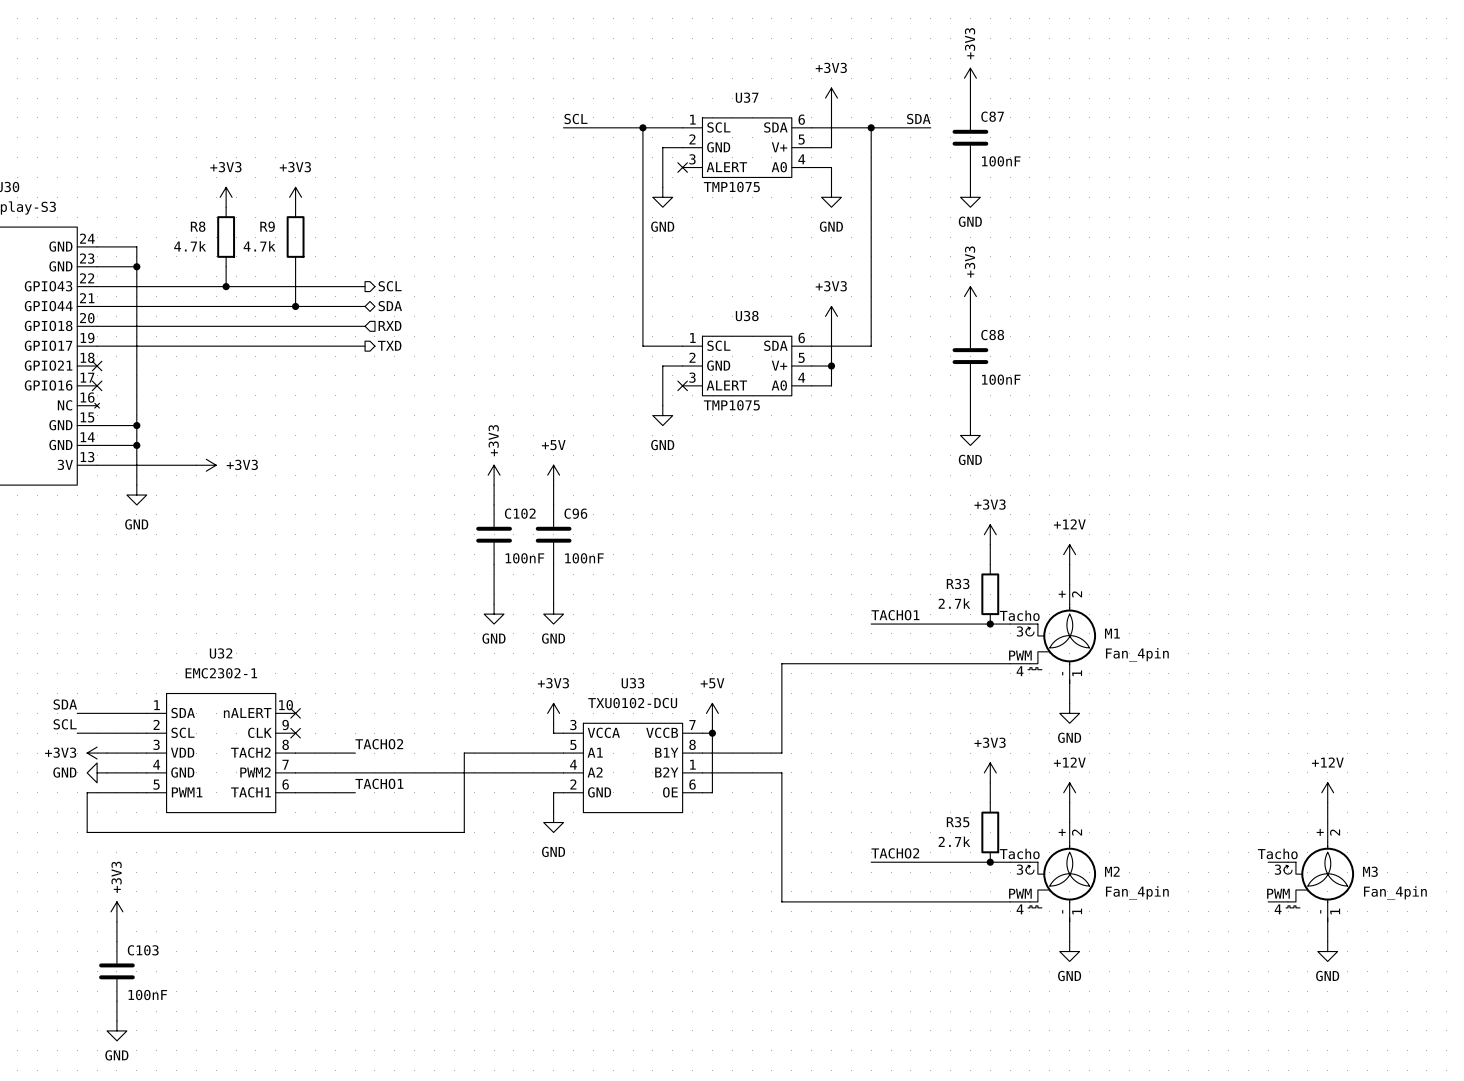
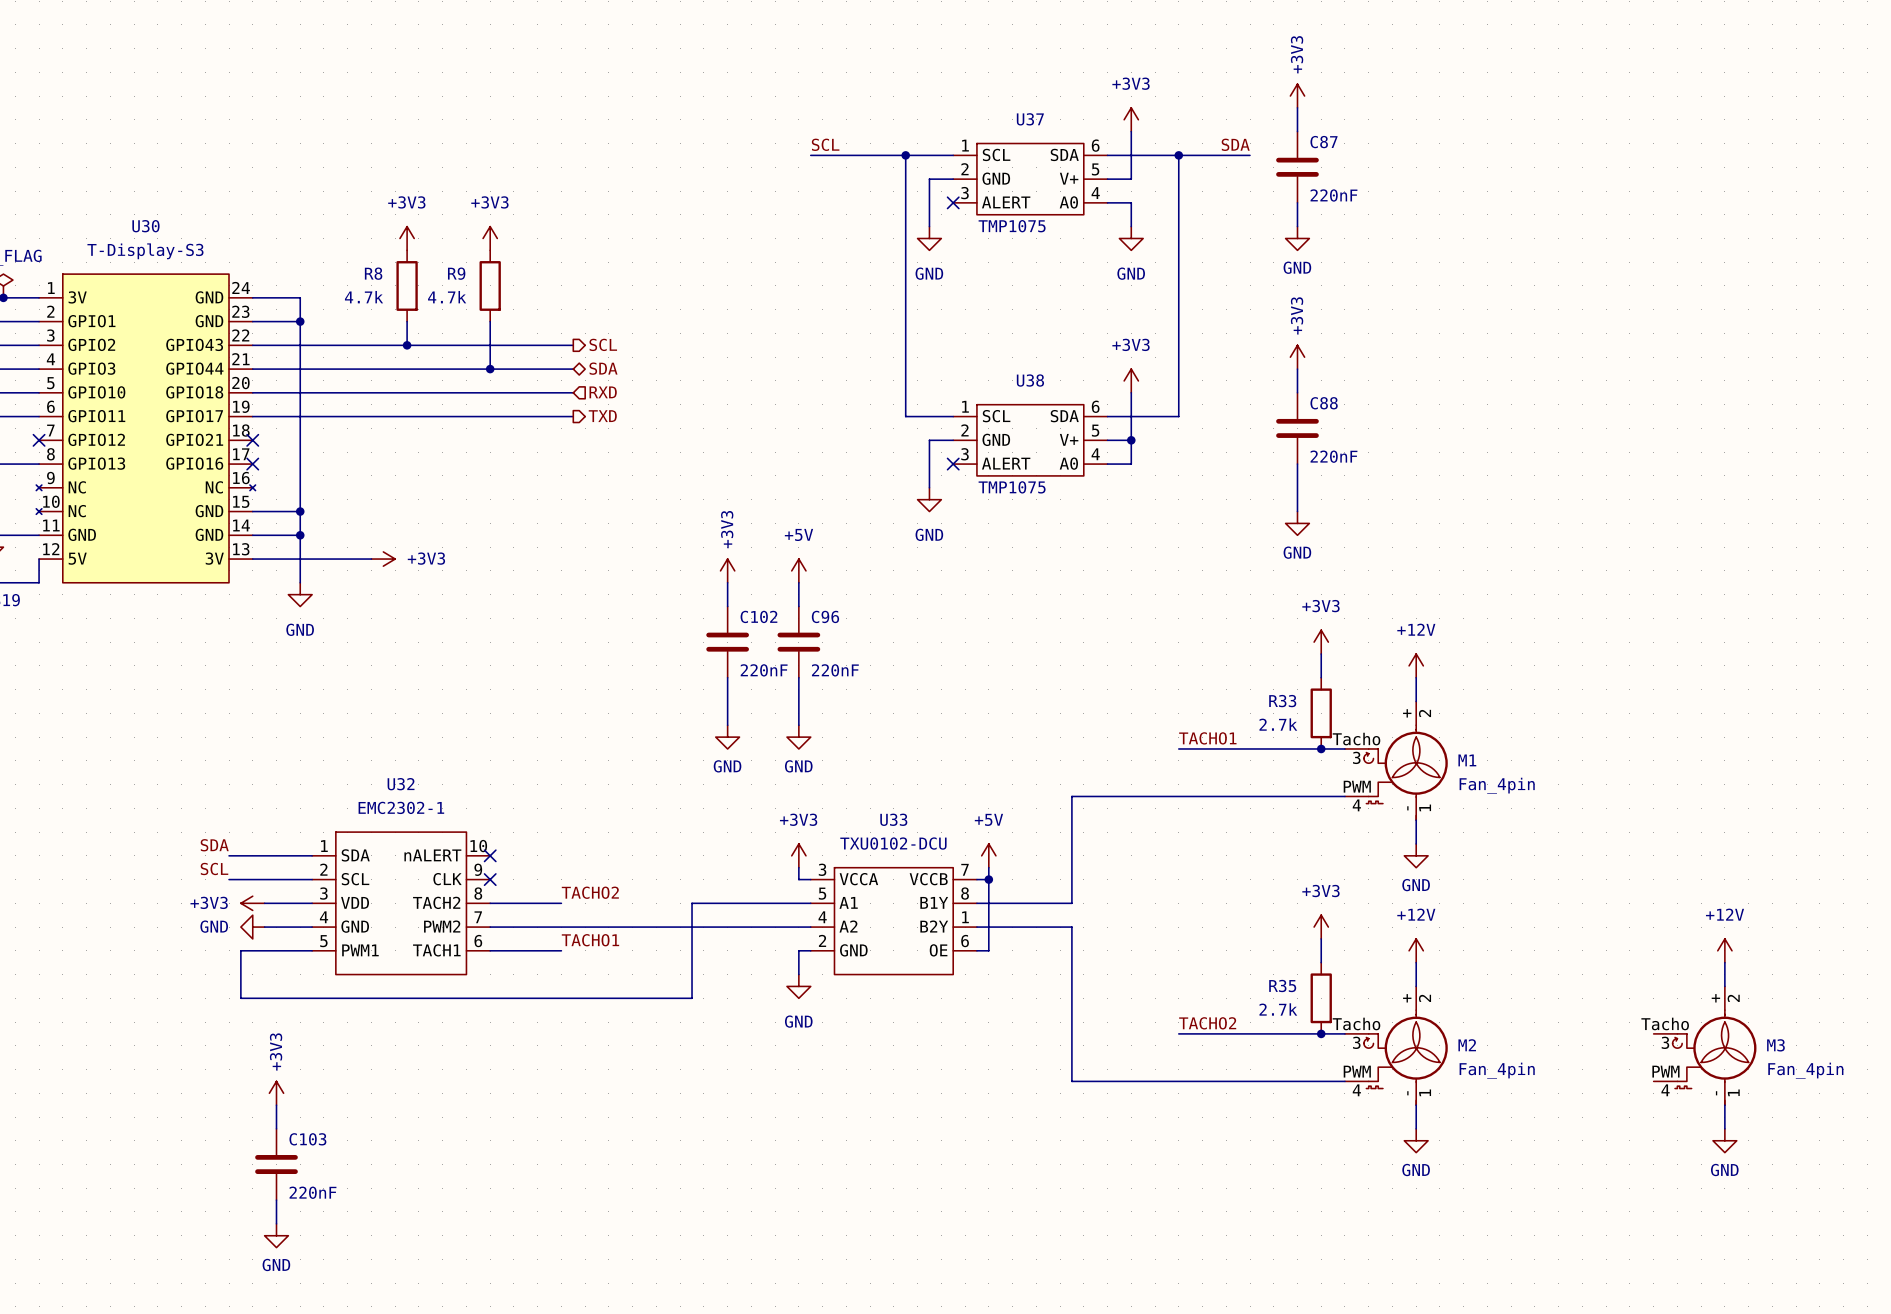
C87 value: 100nF (1001, 161) -> 220nF (1333, 195)
C88 value: 100nF (1001, 379) -> 220nF (1333, 456)
C102 value: 100nF (524, 558) -> 220nF (764, 670)
C96 value: 100nF (584, 558) -> 220nF (835, 670)
C103 value: 100nF (147, 994) -> 220nF (313, 1192)

